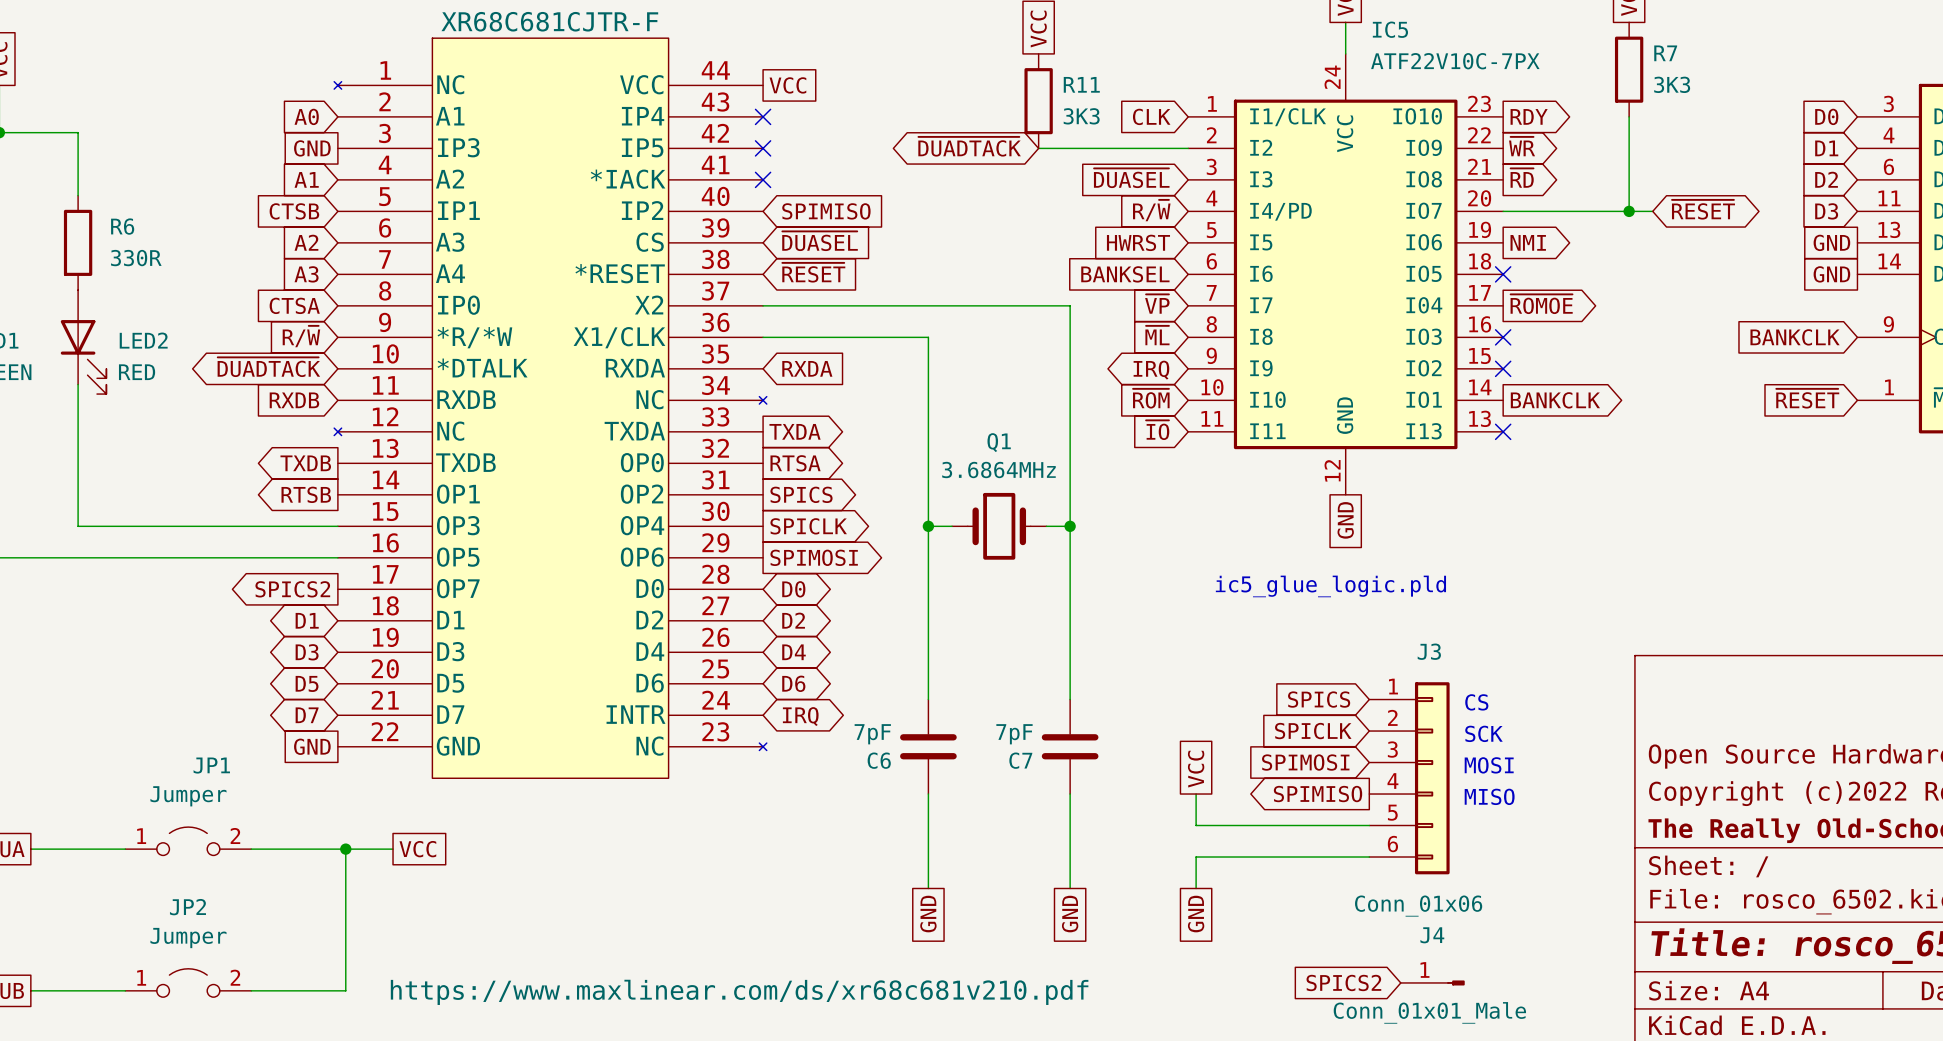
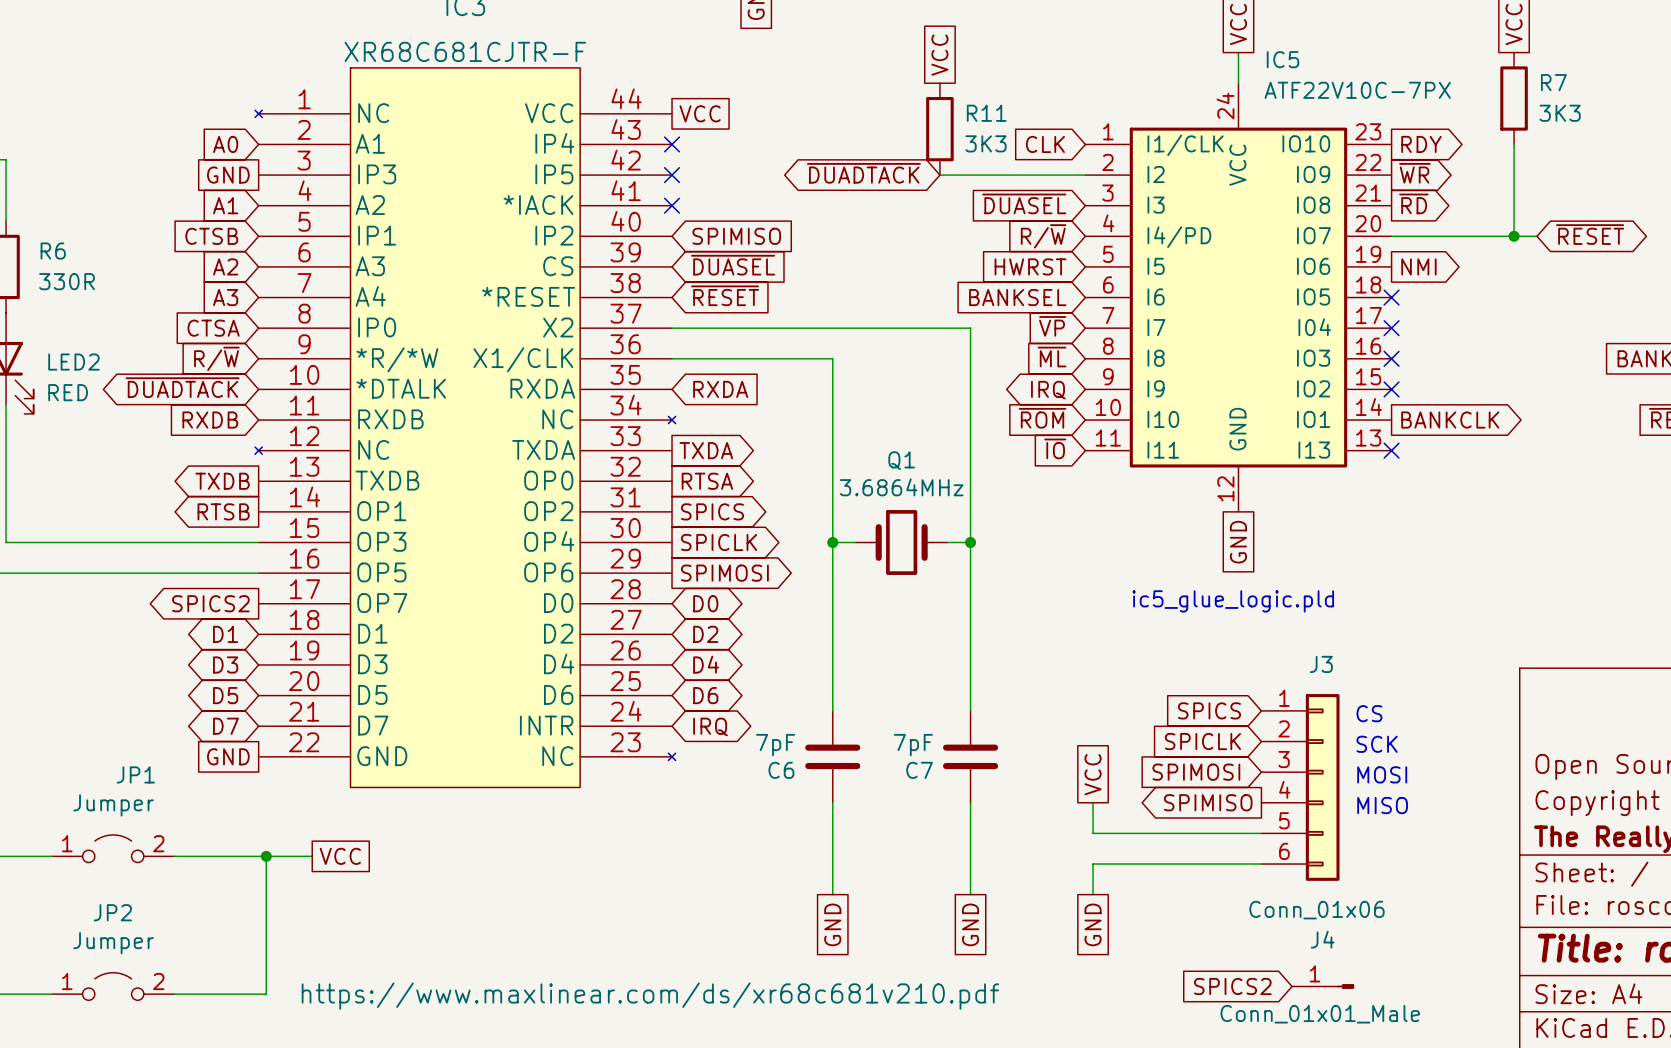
global label: ~{ROMOE} (1541, 304) -> none
no-connect mark: none -> (1391, 328)

